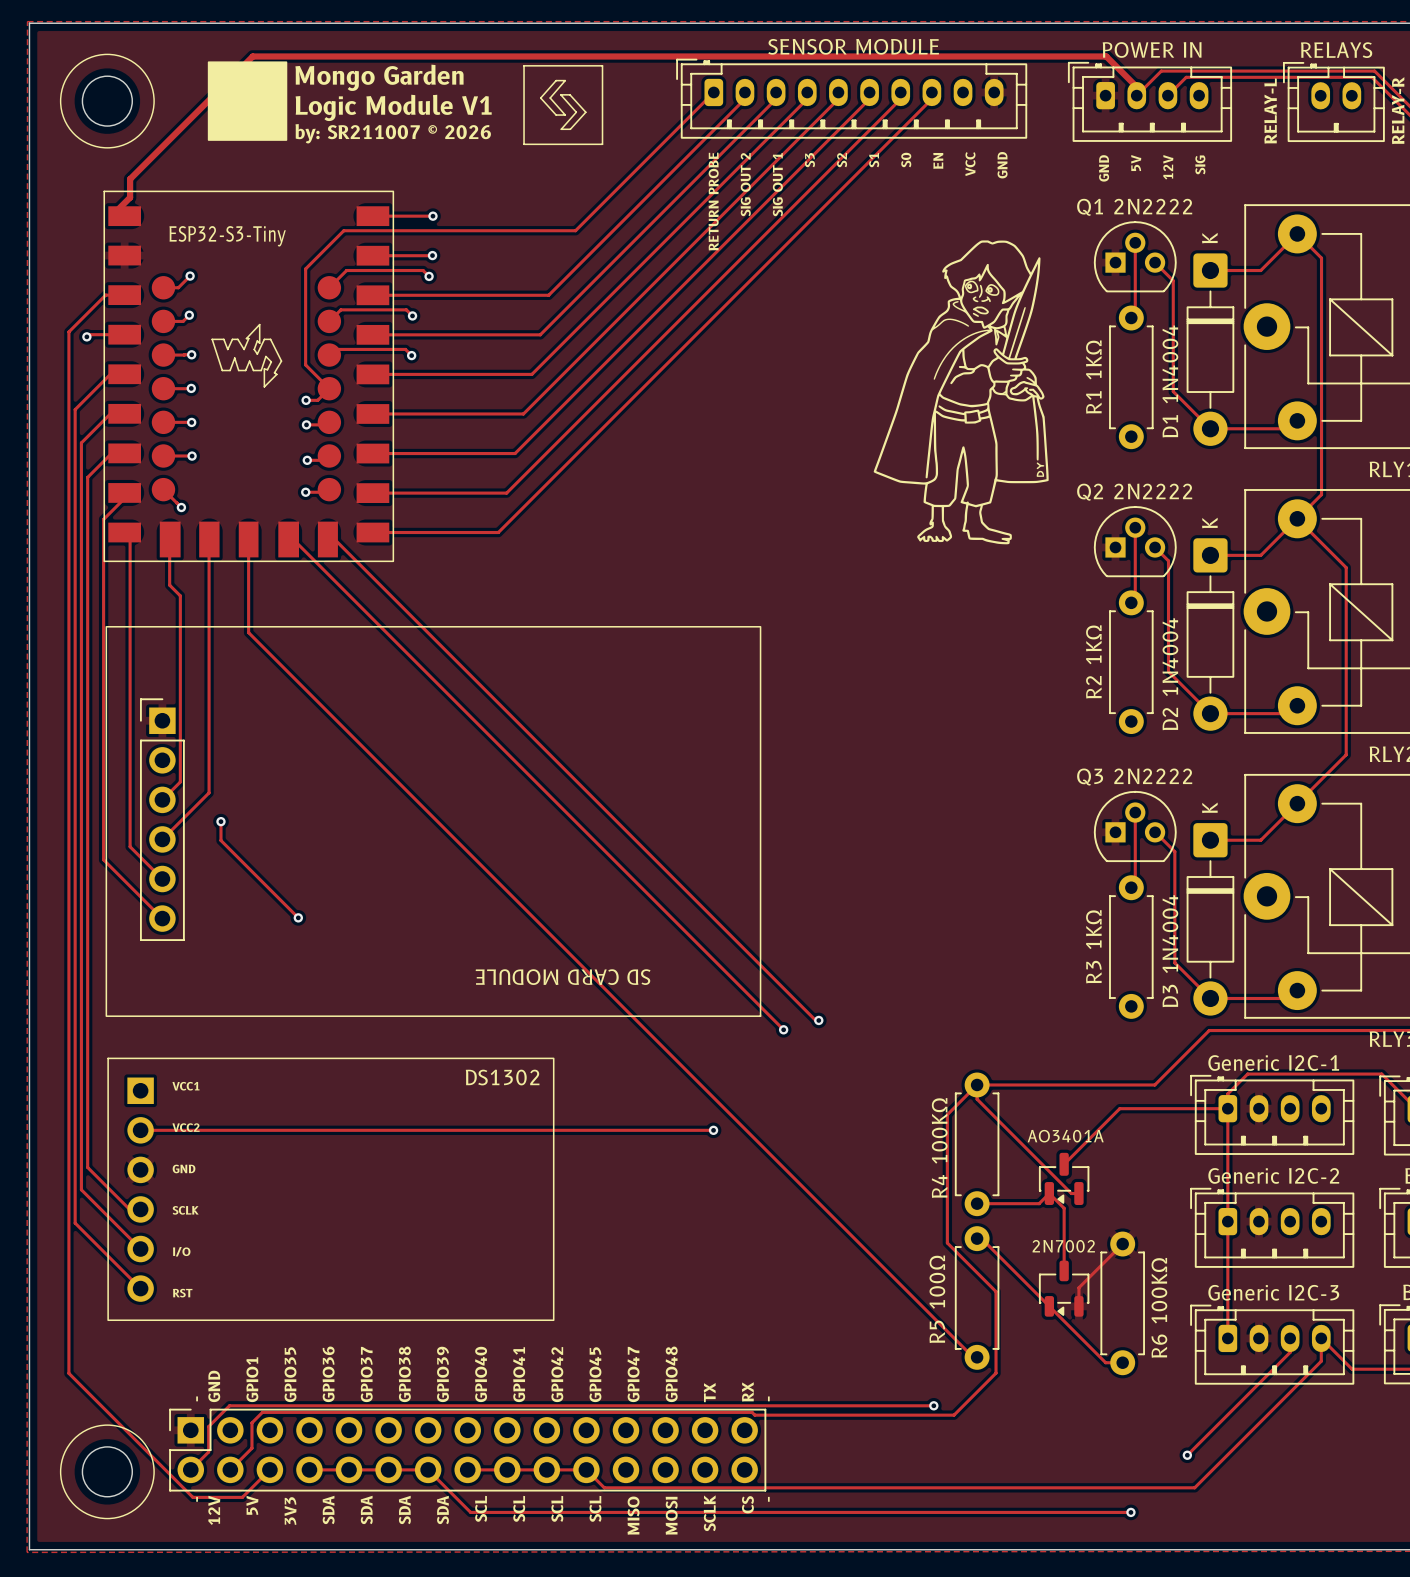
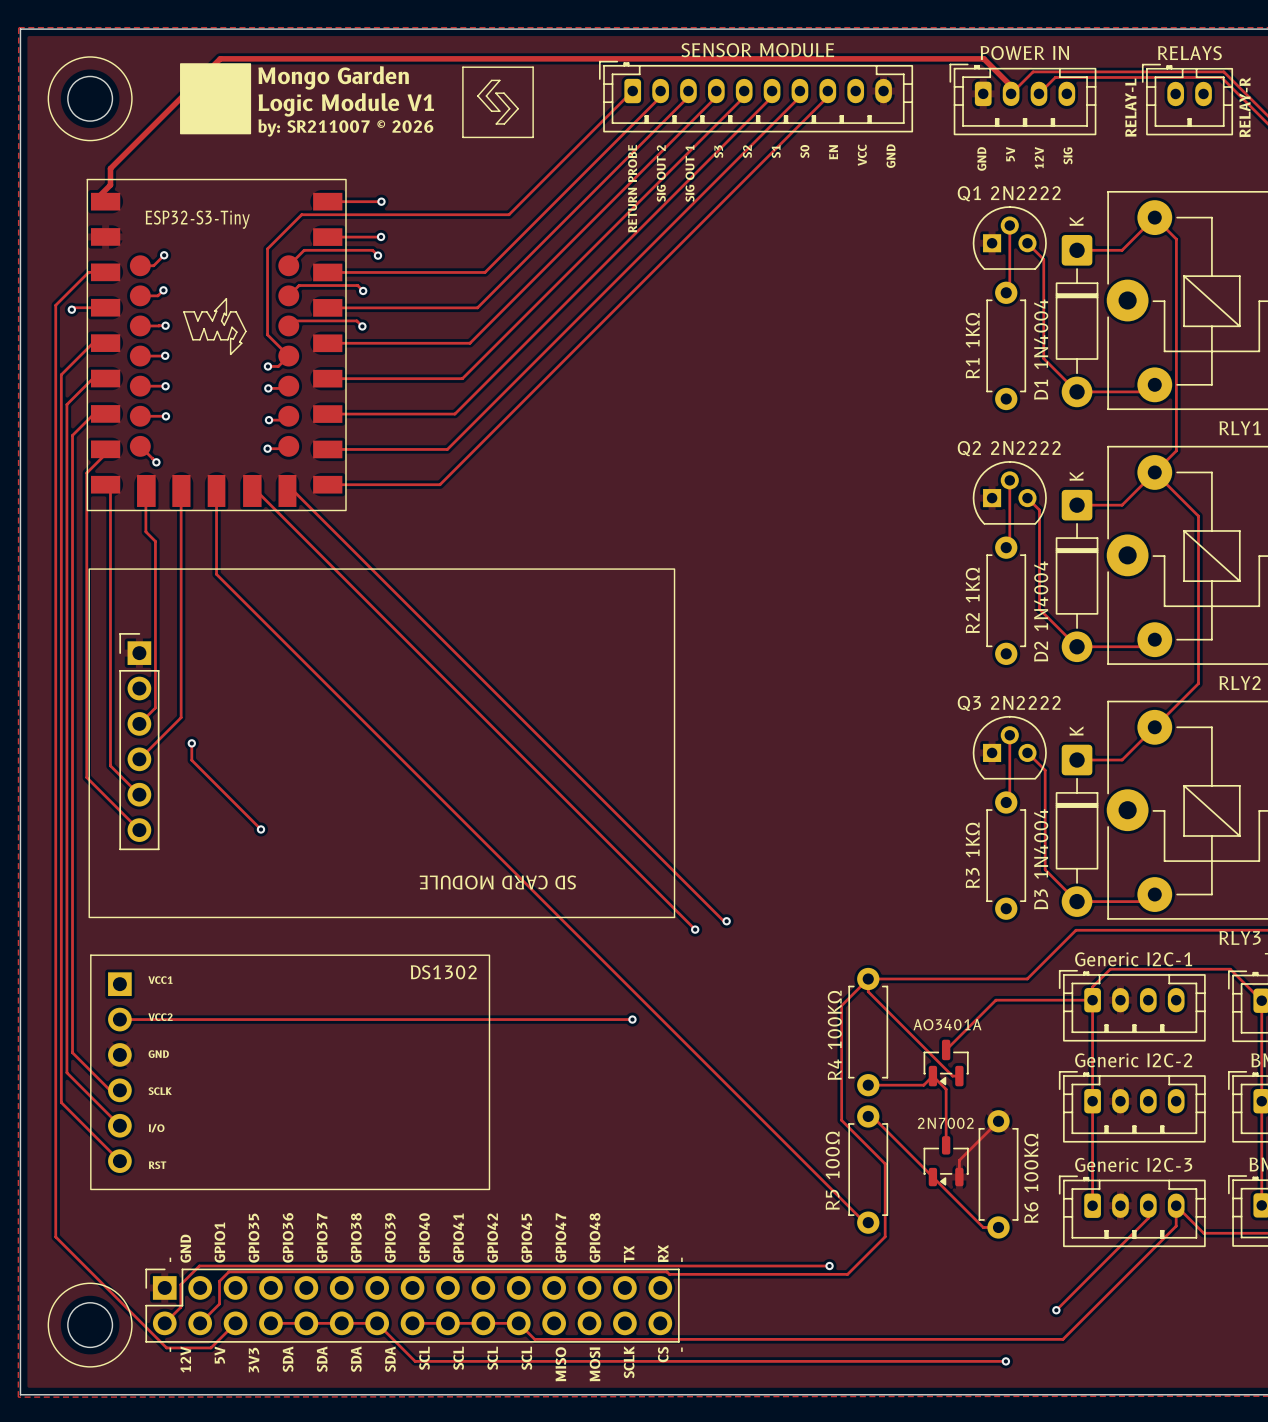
drawing: [873, 240, 1049, 545] -> none

